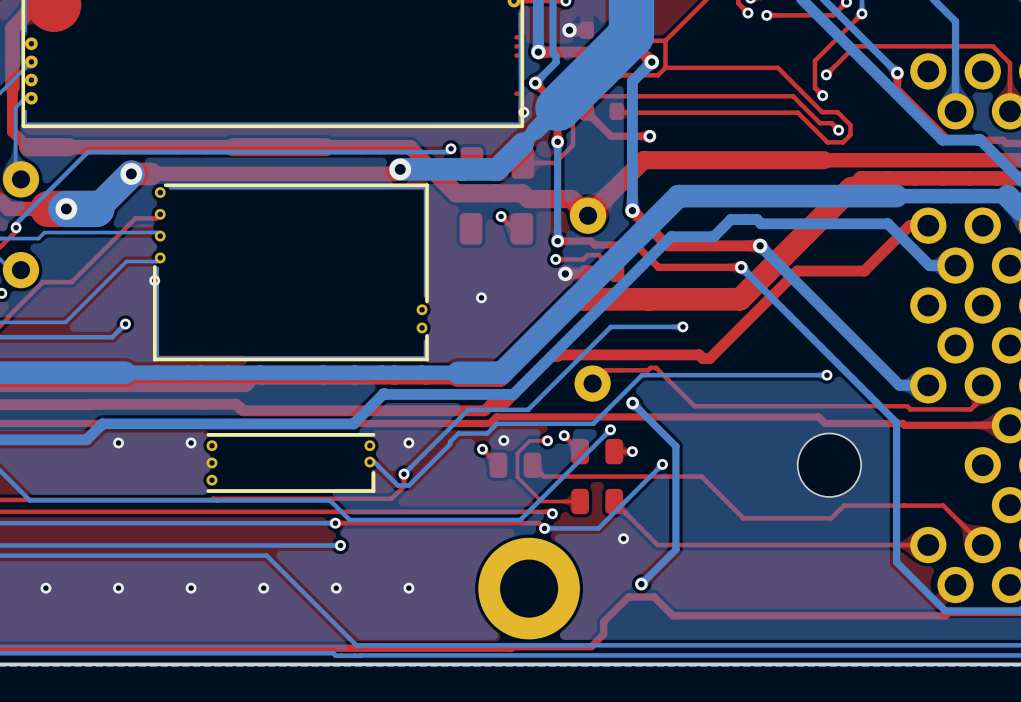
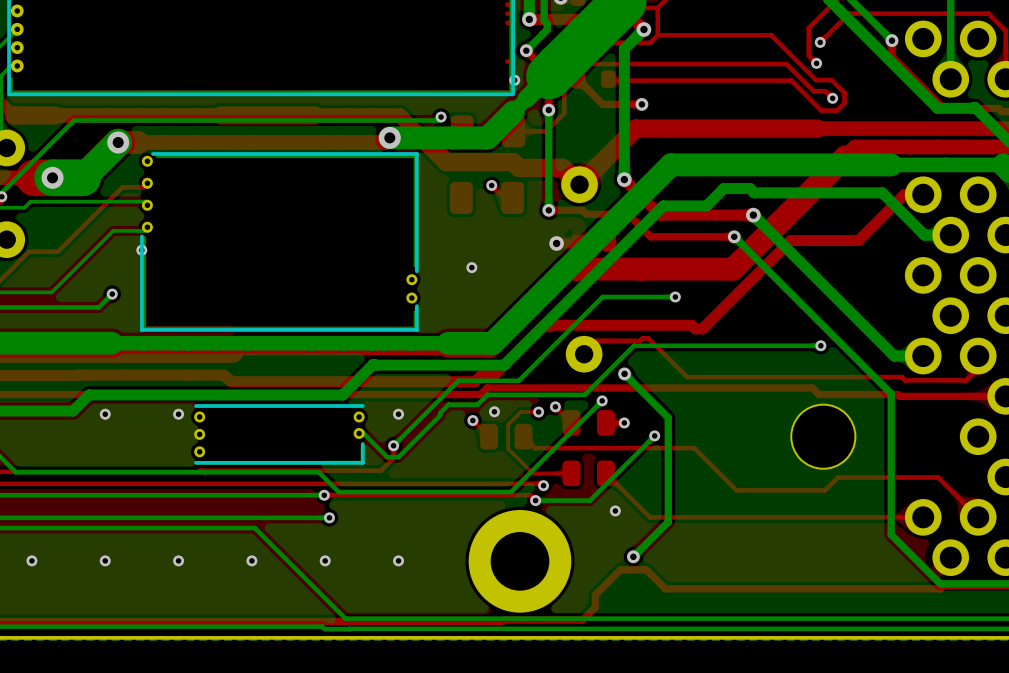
top track: (555, 259) (583, 259) (587, 255) (598, 255) (617, 273) -> none
via: (555, 259) -> none

